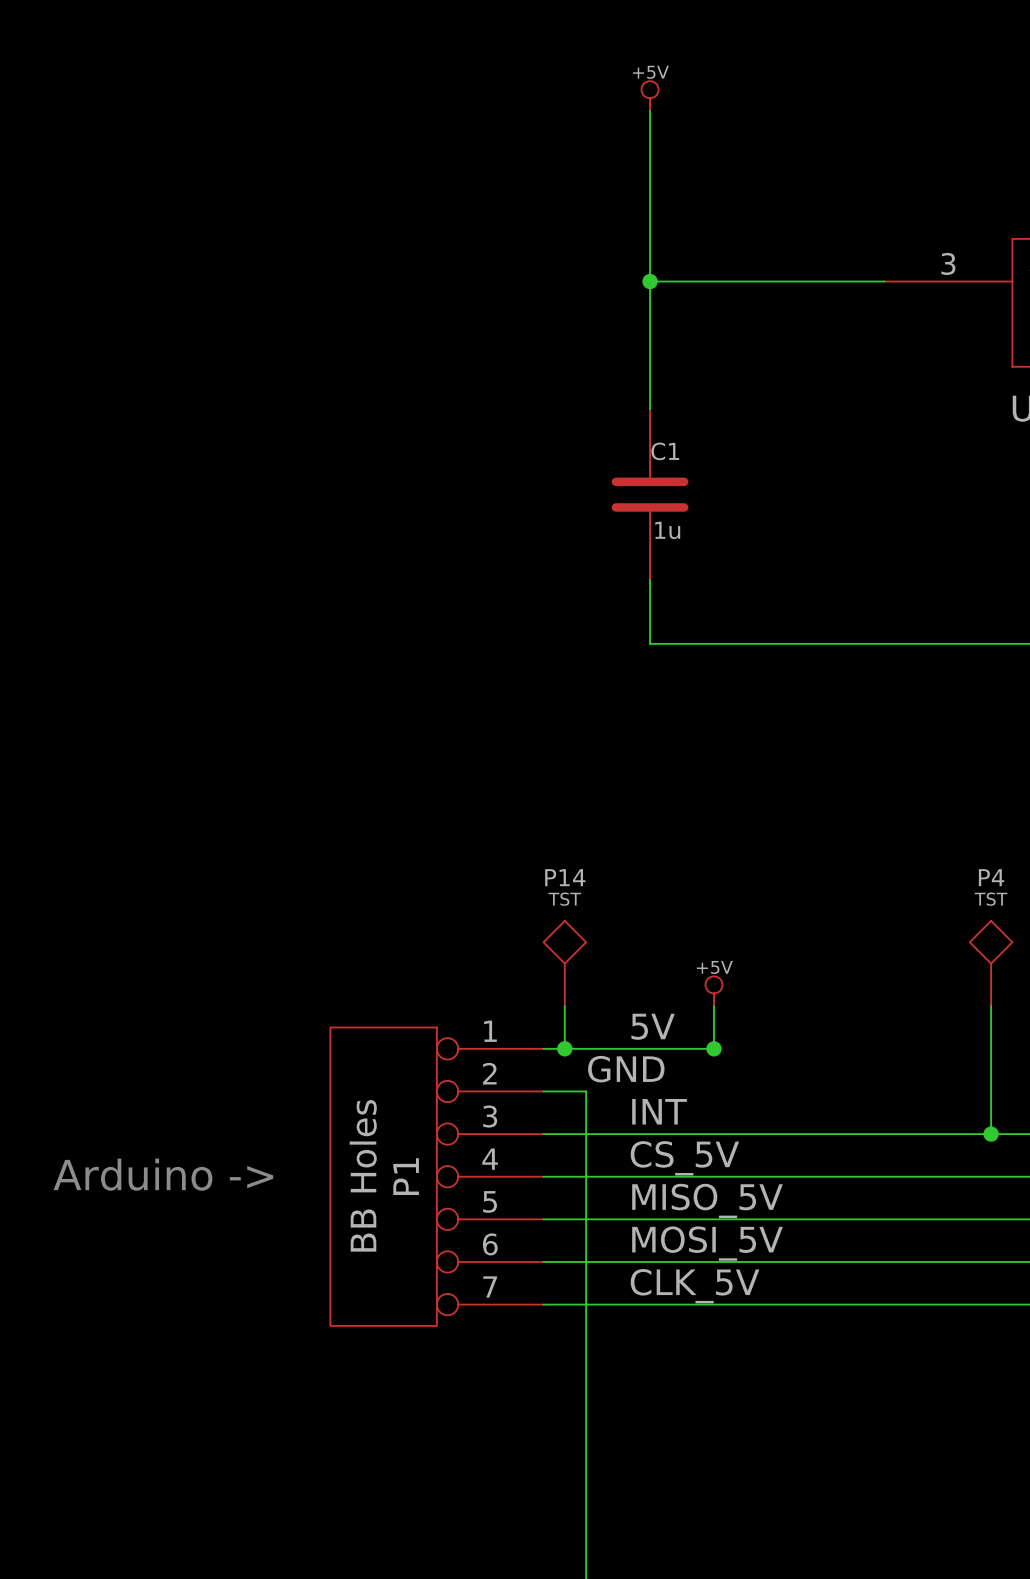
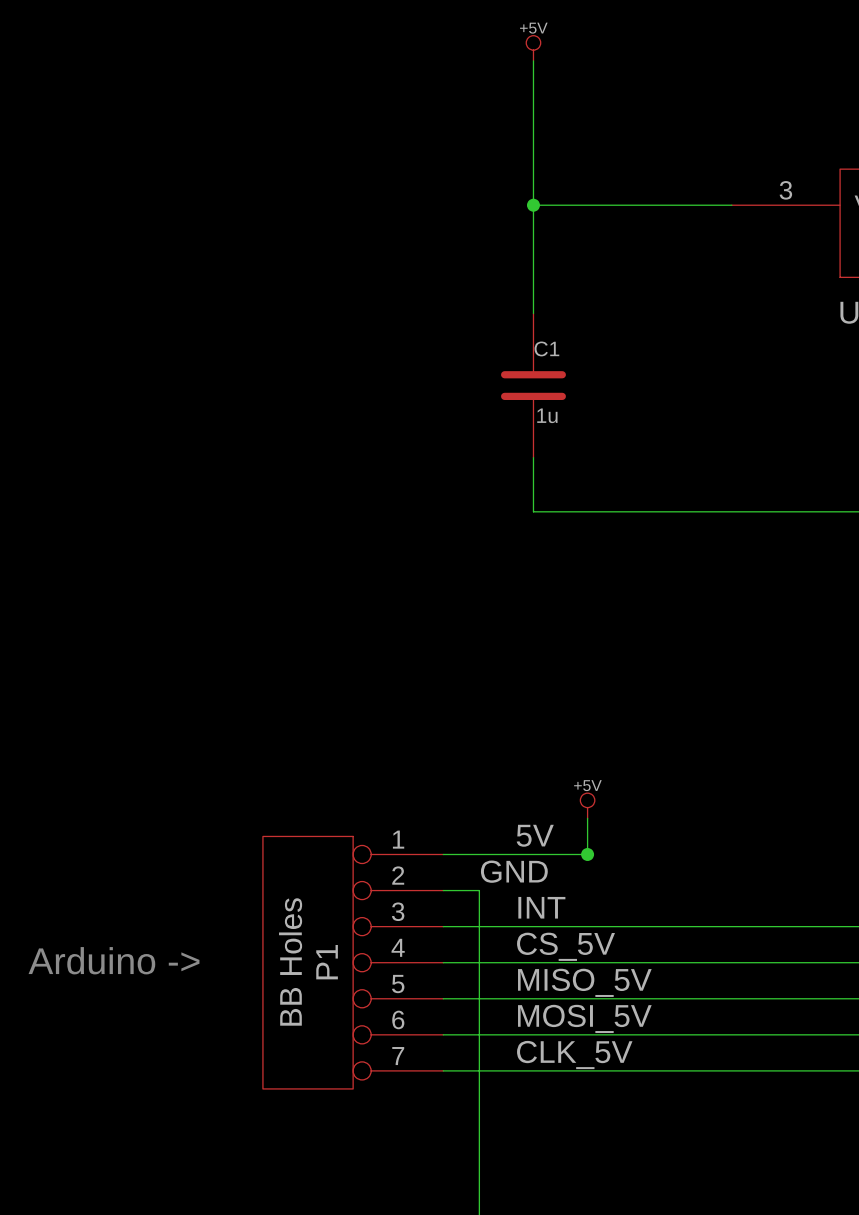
P14: TST (564, 963) -> none
P4: TST (991, 963) -> none
wire: (564, 1006) (564, 1048) -> none
wire: (991, 1006) (991, 1134) -> none
junction: (564, 1048) -> none
junction: (991, 1134) -> none

